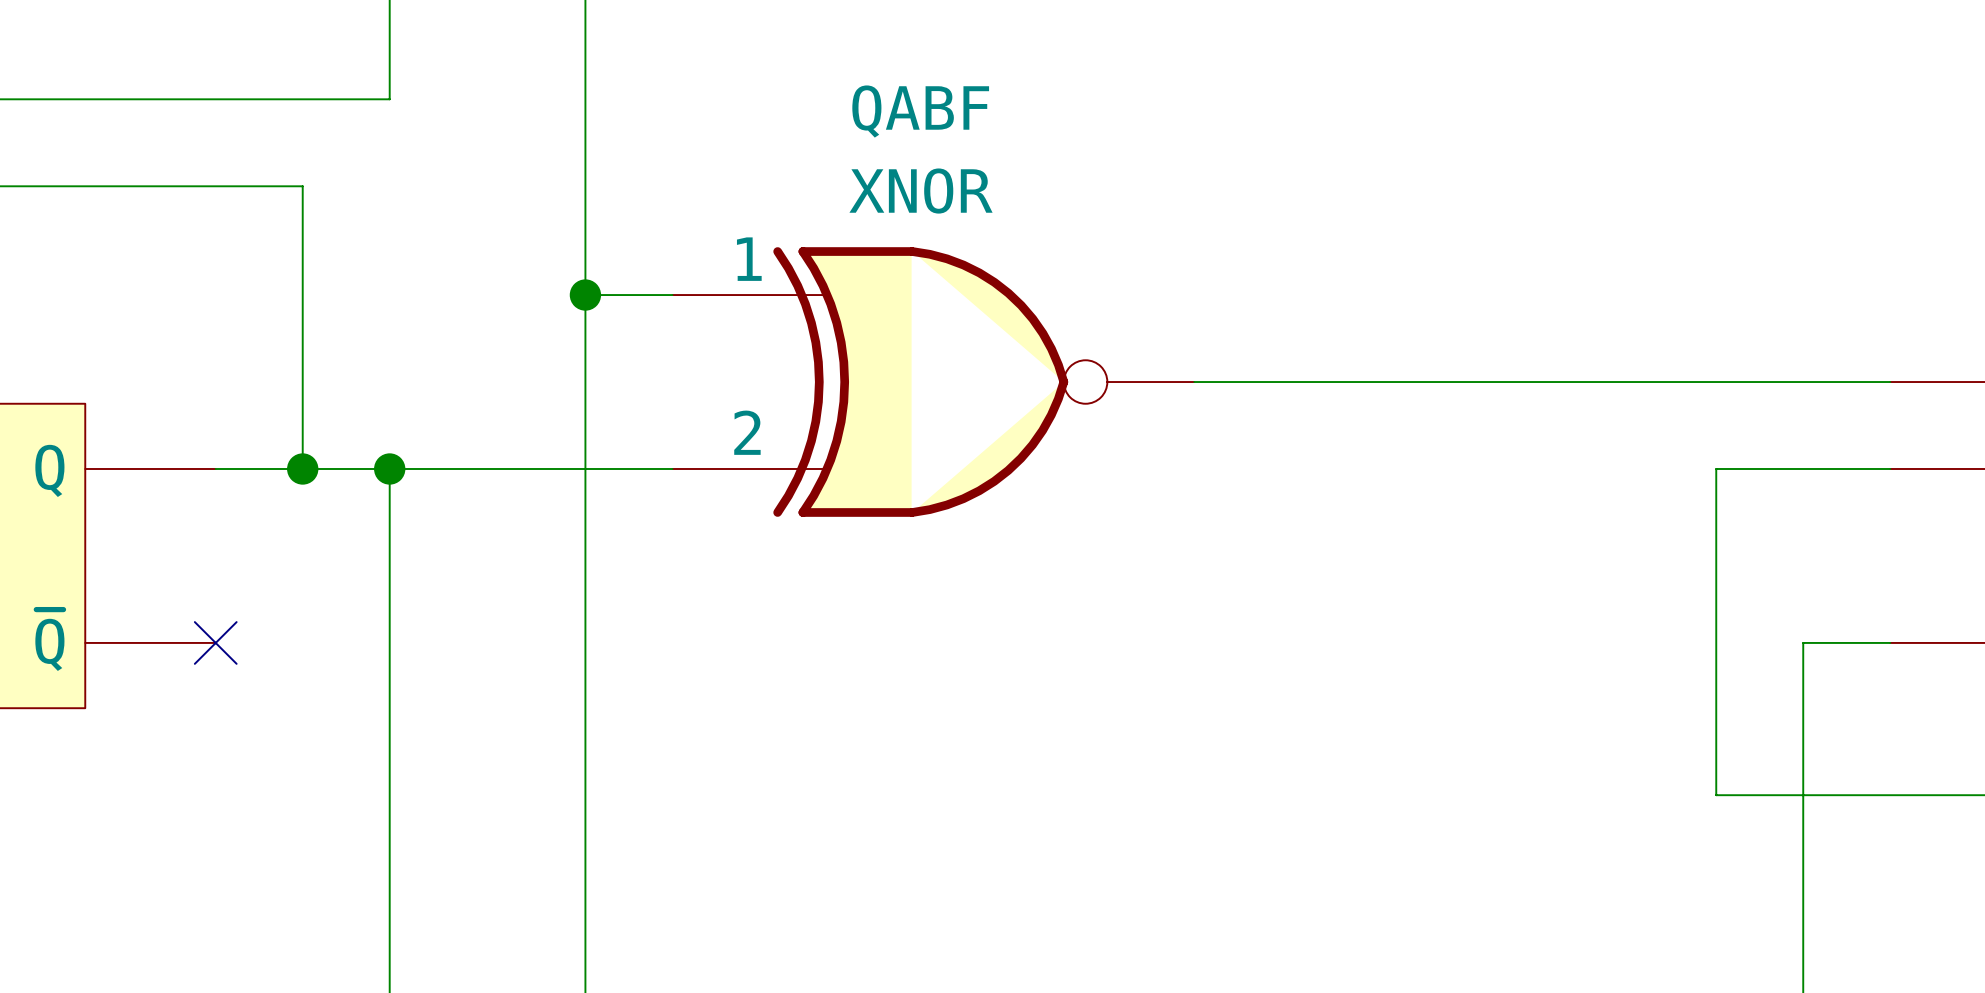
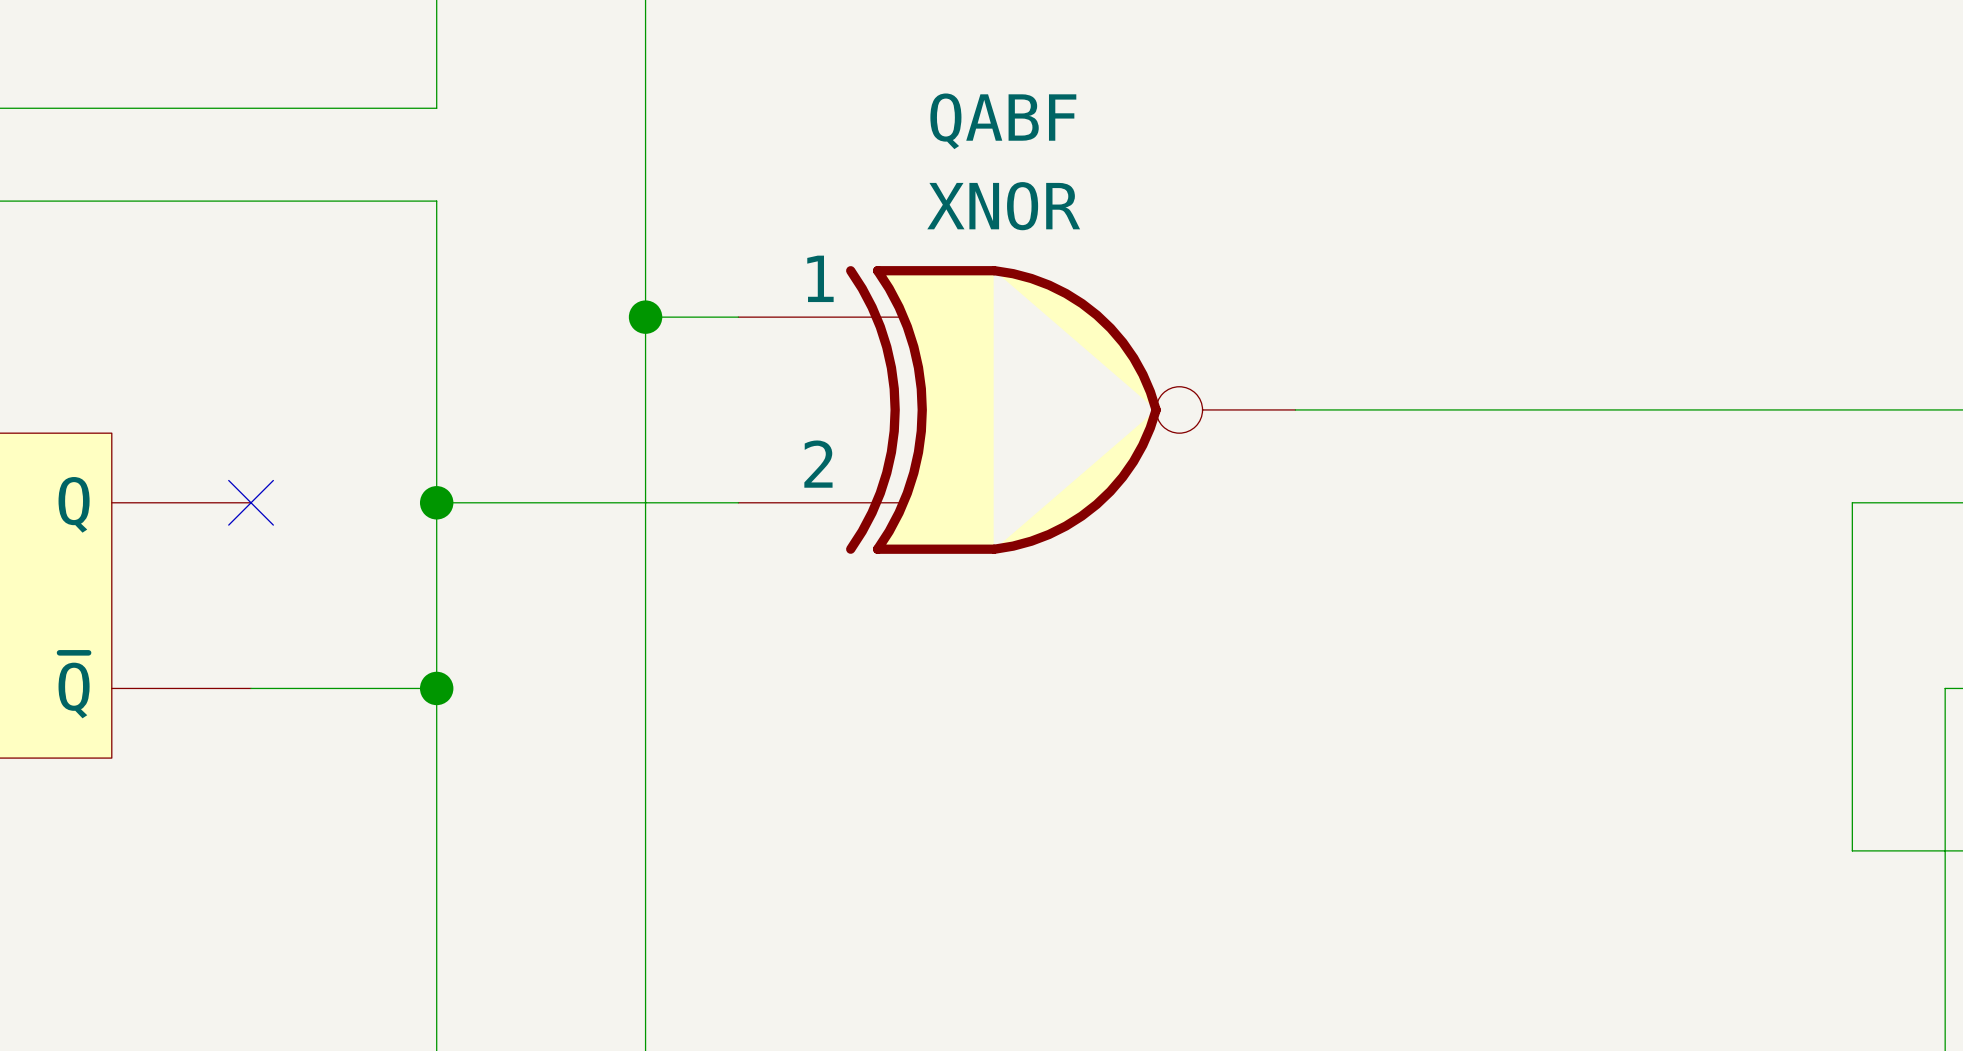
wire: (302, 186) (302, 468) -> (343, 201) (436, 201) (436, 502)
wire: (215, 468) (389, 468) -> (251, 688) (436, 688)
junction position: (302, 468) -> (436, 688)
no-connect mark position: (215, 642) -> (251, 502)

